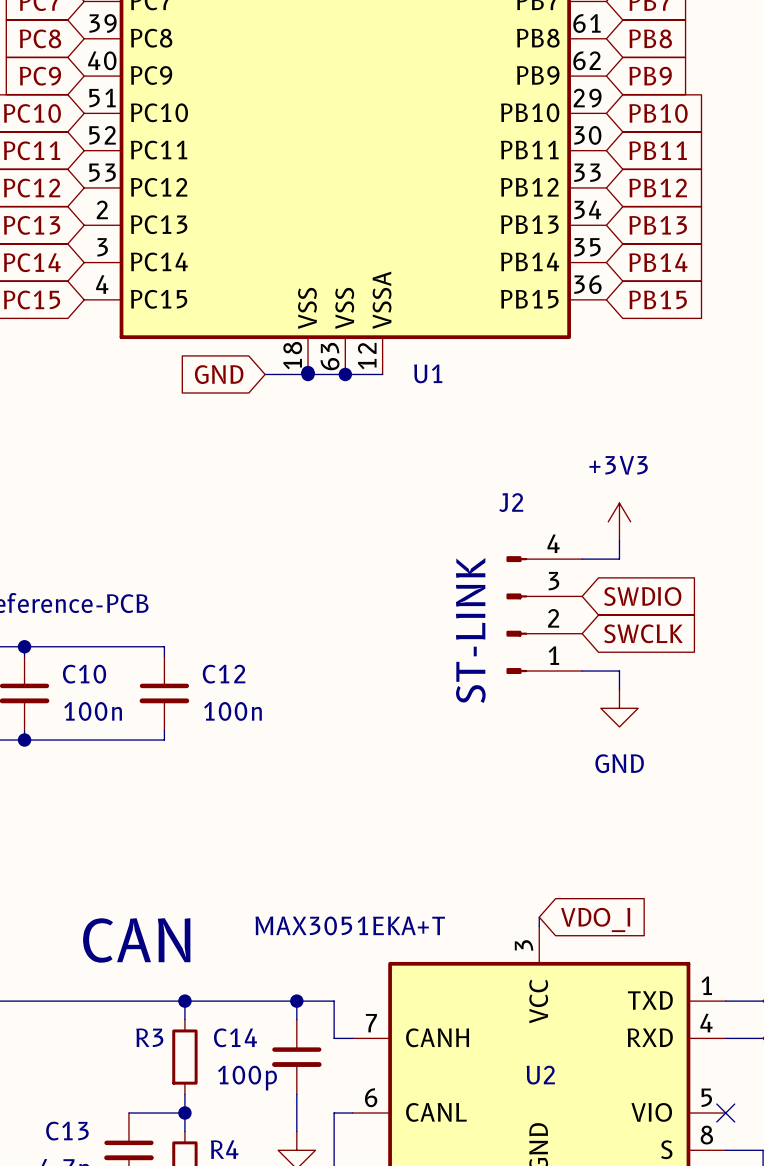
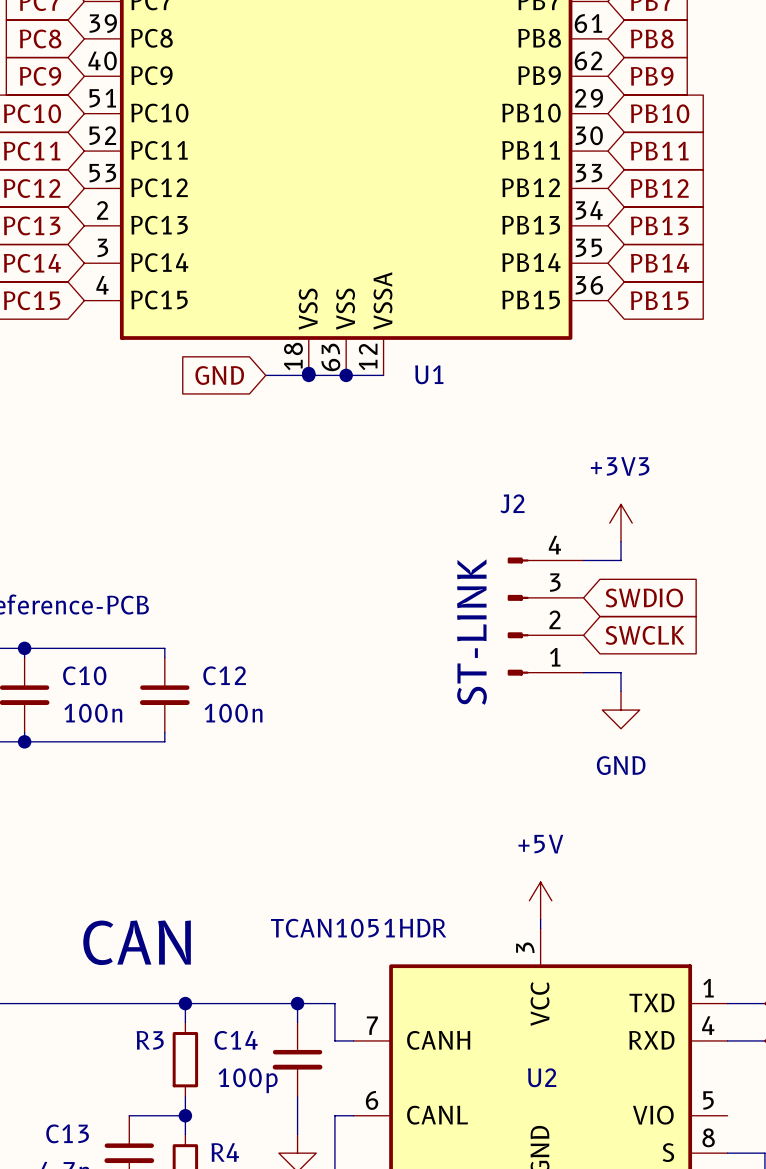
power symbol: none -> +5V (540, 900)
global label: VDO_I (595, 919) -> none
U2 value: MAX3051EKA+T (350, 925) -> TCAN1051HDR (358, 928)
no-connect mark: (725, 1113) -> none

